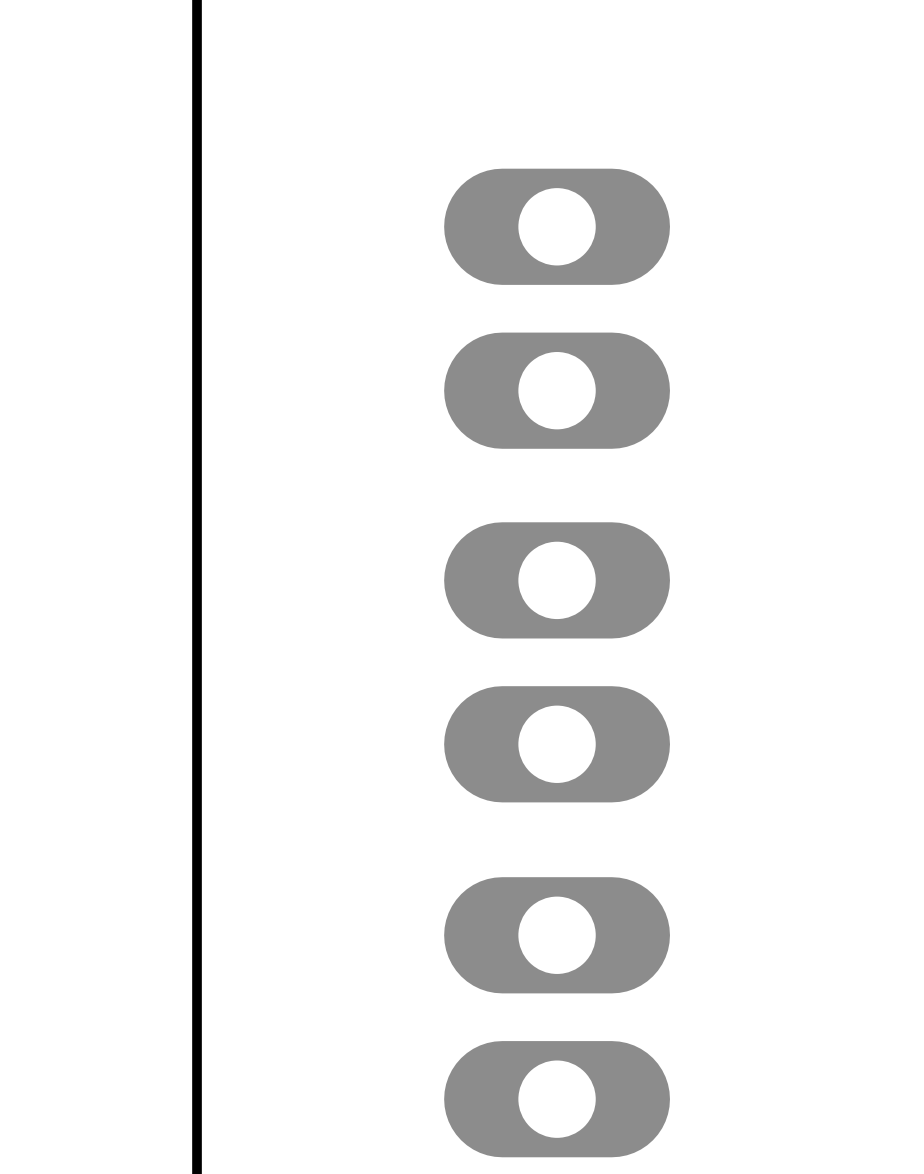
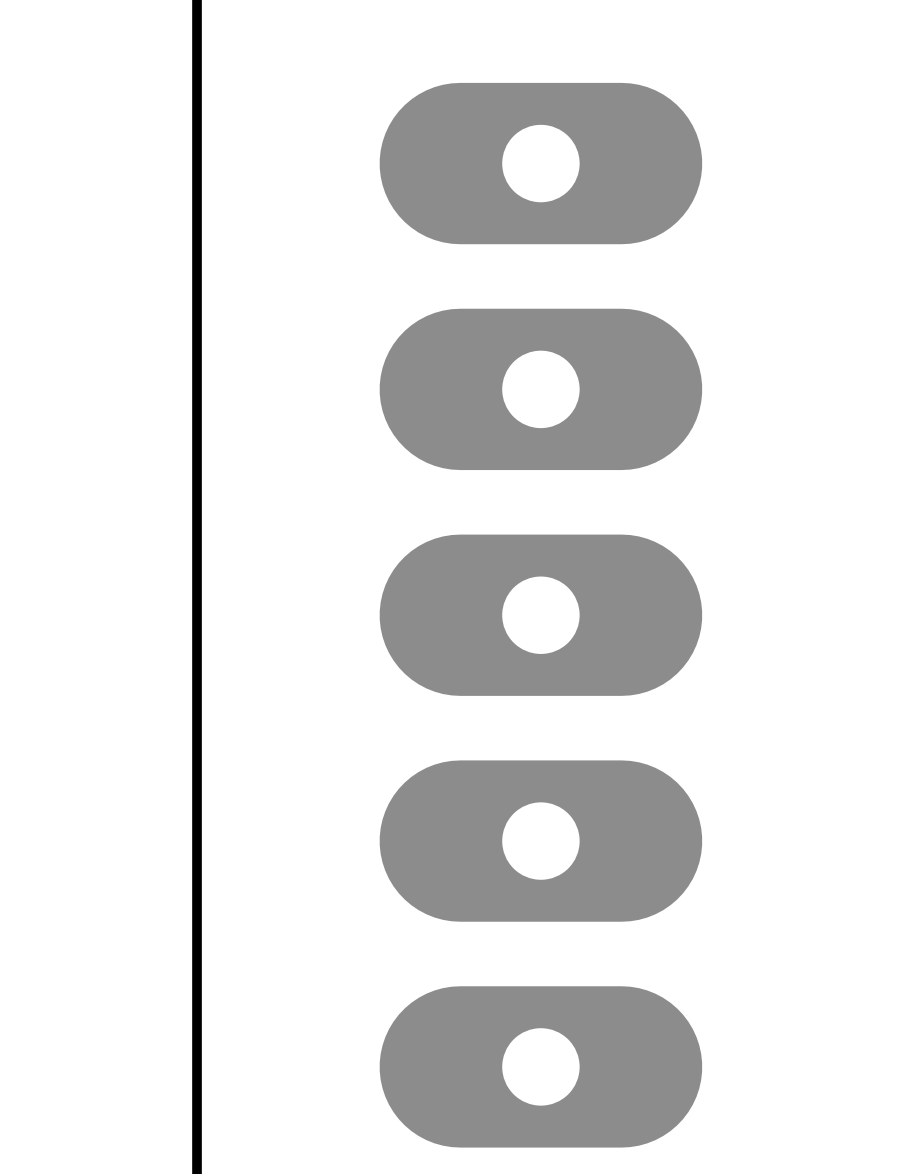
part: (557, 308) -> none
part footprint: [444, 522, 670, 803] -> [379, 82, 703, 1148]
part: (557, 1017) -> none

